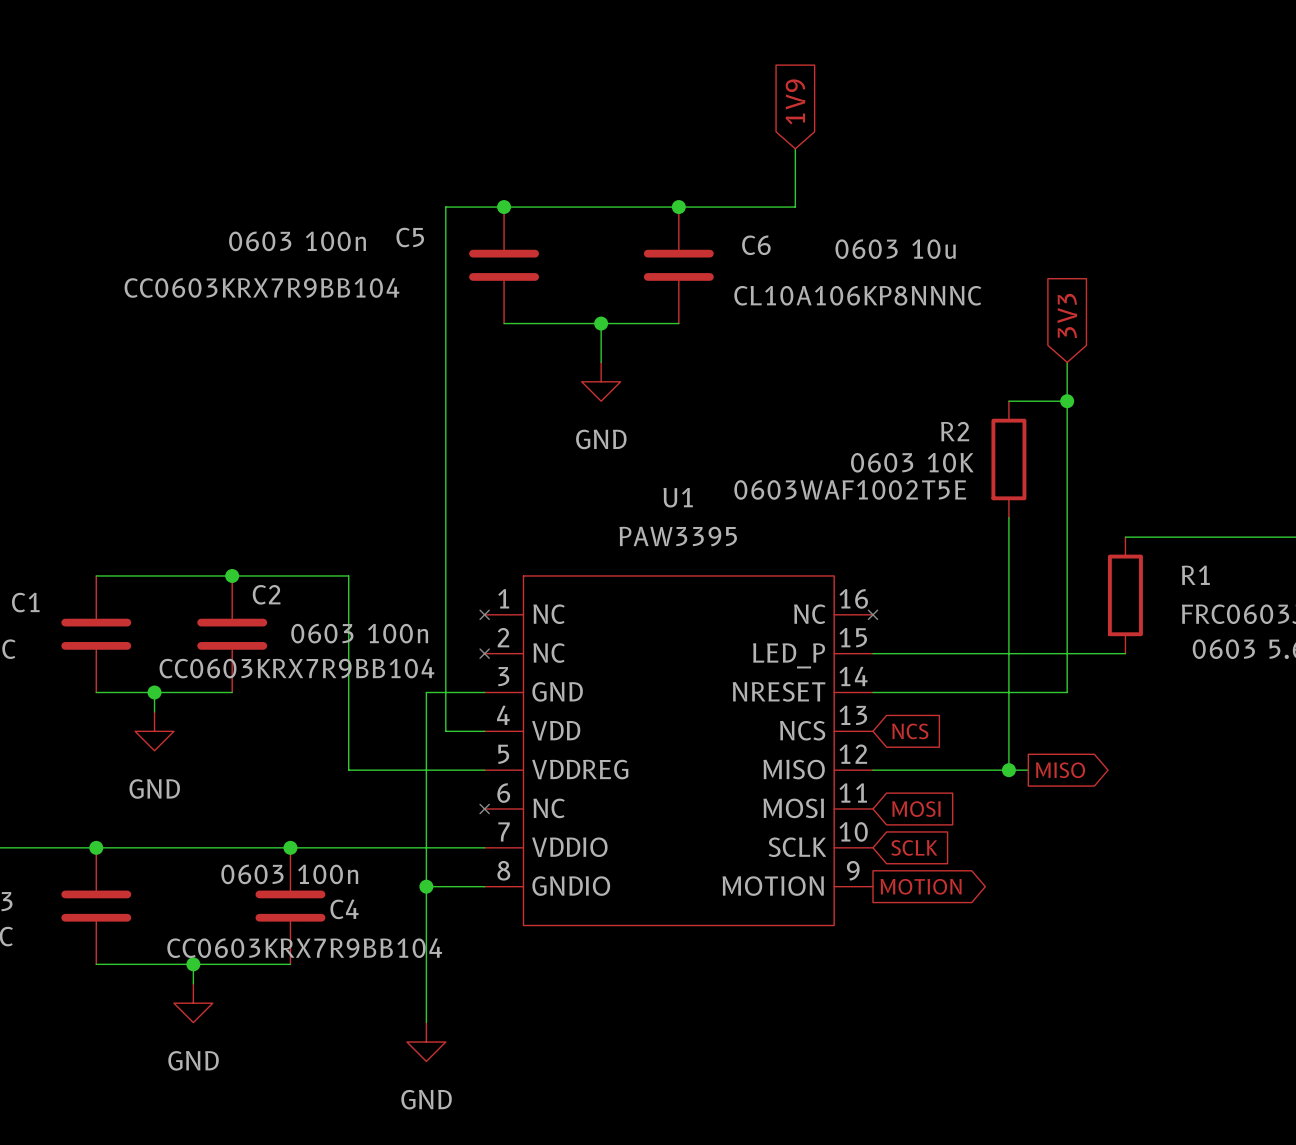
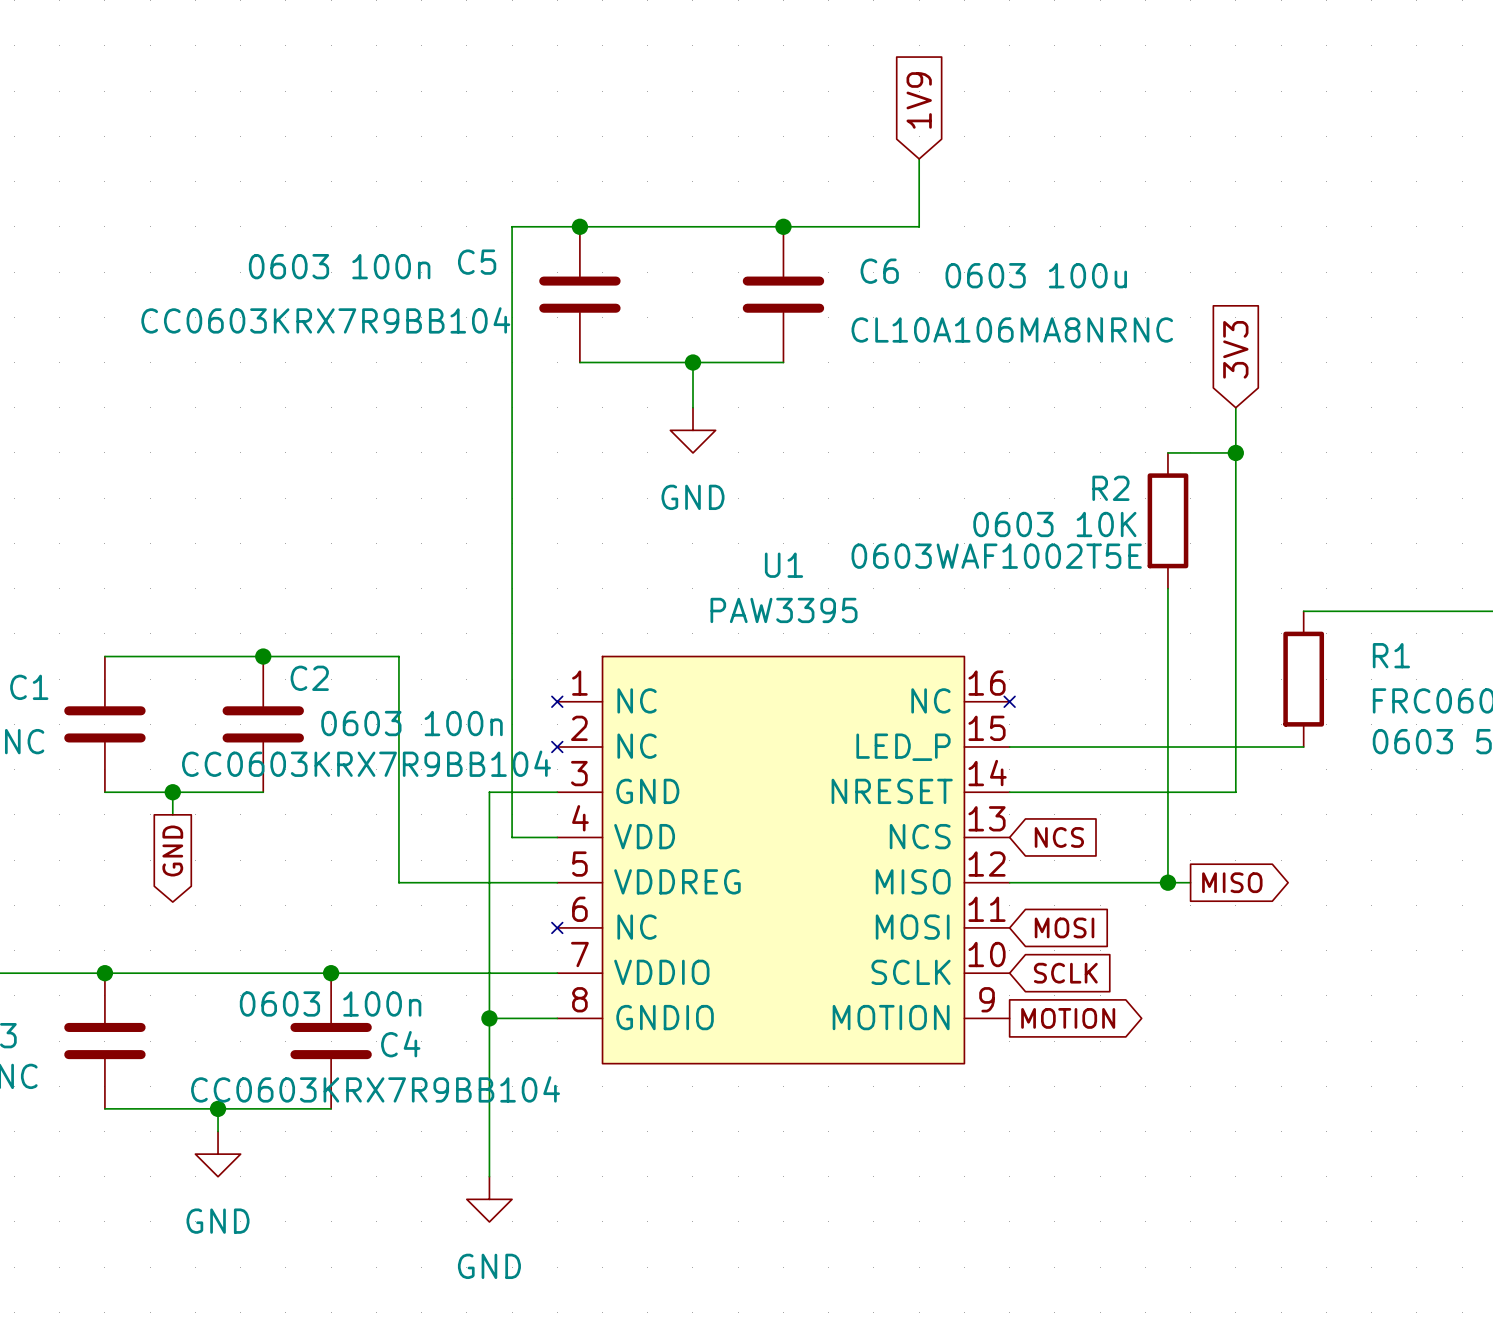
C6 text: 0603 10u (895, 249) -> 0603 100u (1036, 275)
C6 value: CL10A106KP8NNNC (857, 295) -> CL10A106MA8NRNC (1012, 329)
power symbol: GND (154, 731) -> none
global label: none -> GND (172, 850)

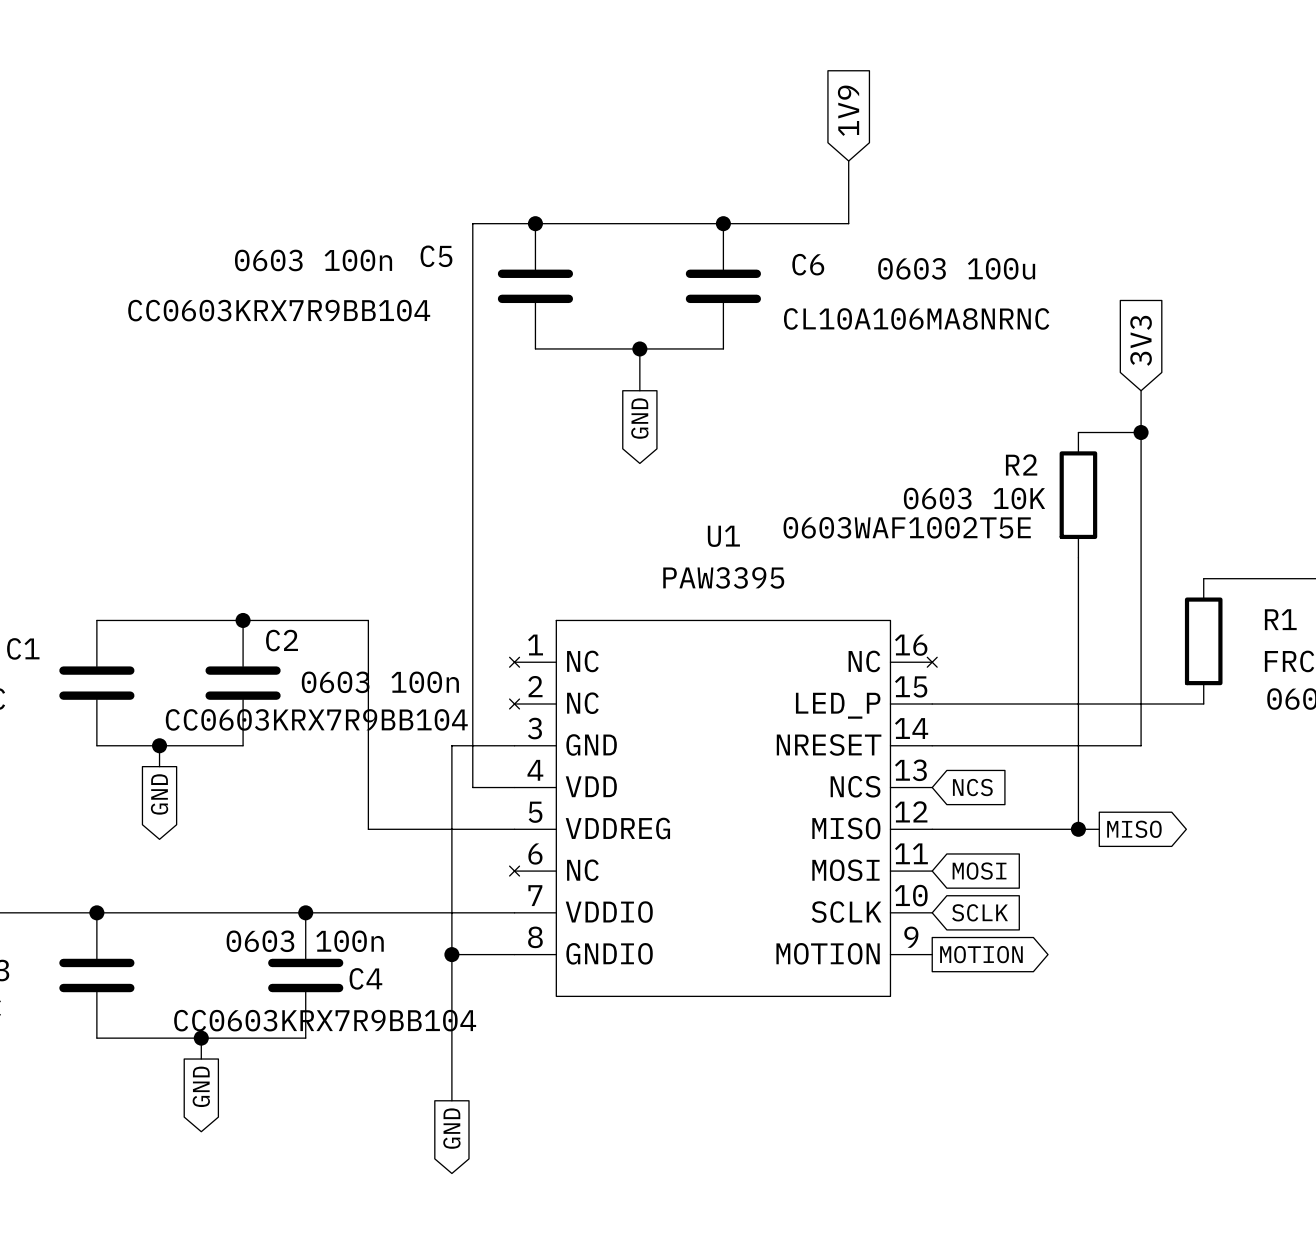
power symbol: GND (692, 430) -> none
global label: none -> GND (639, 418)
power symbol: GND (218, 1154) -> none
global label: none -> GND (201, 1086)
power symbol: GND (489, 1199) -> none
global label: none -> GND (451, 1128)

